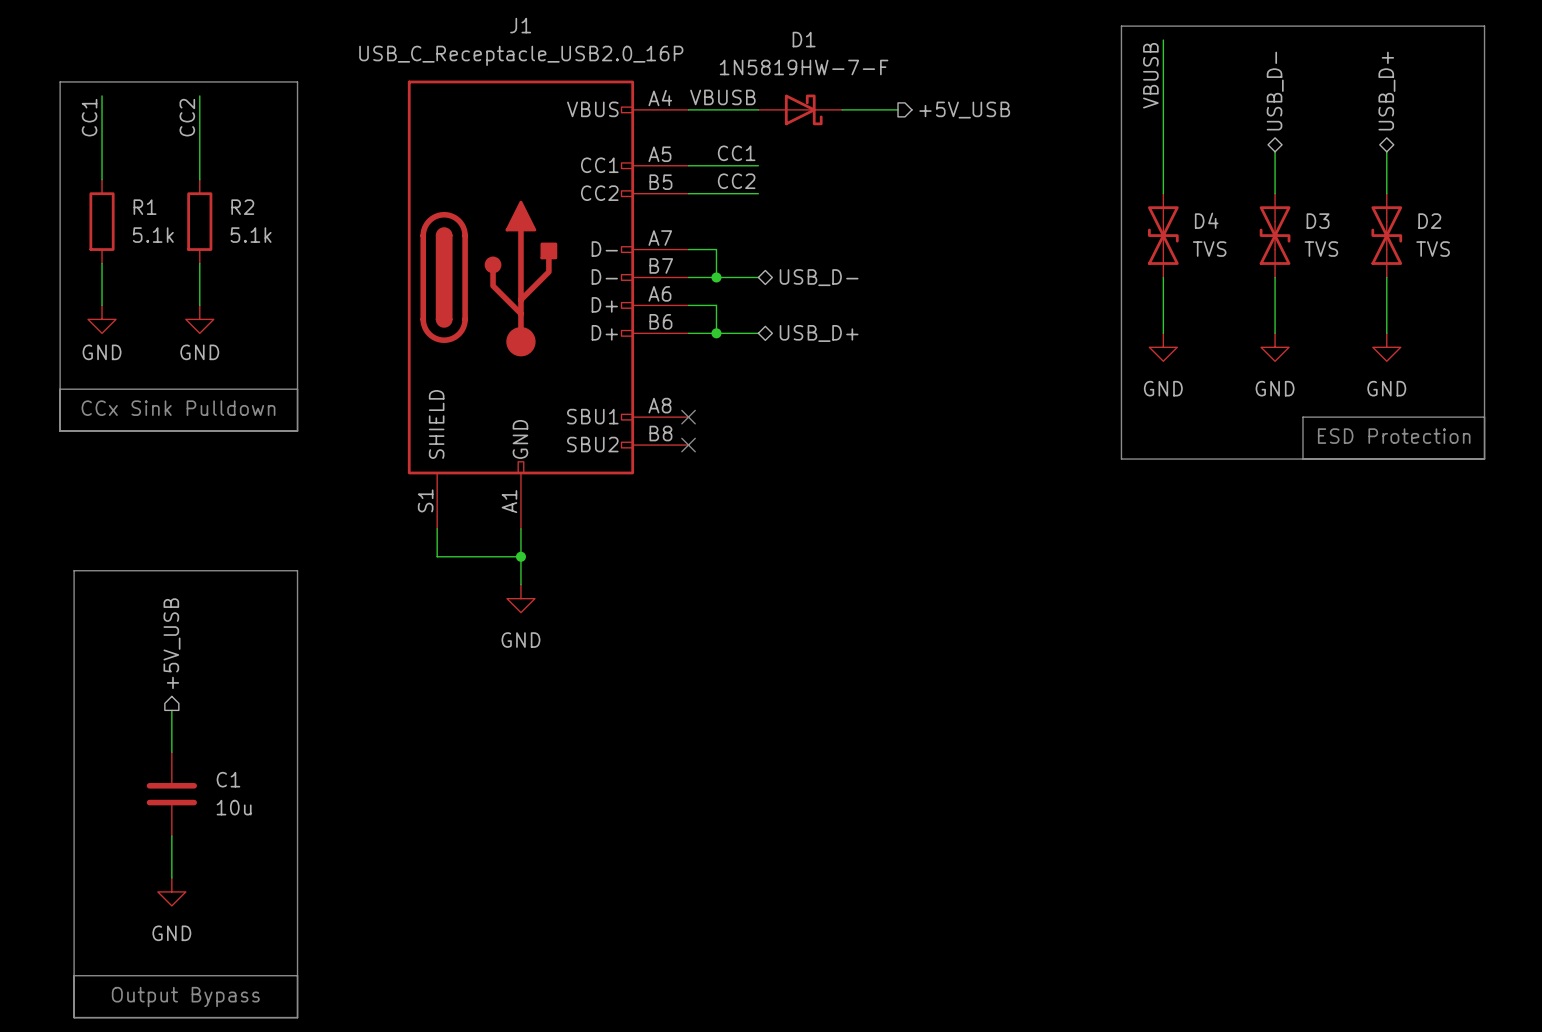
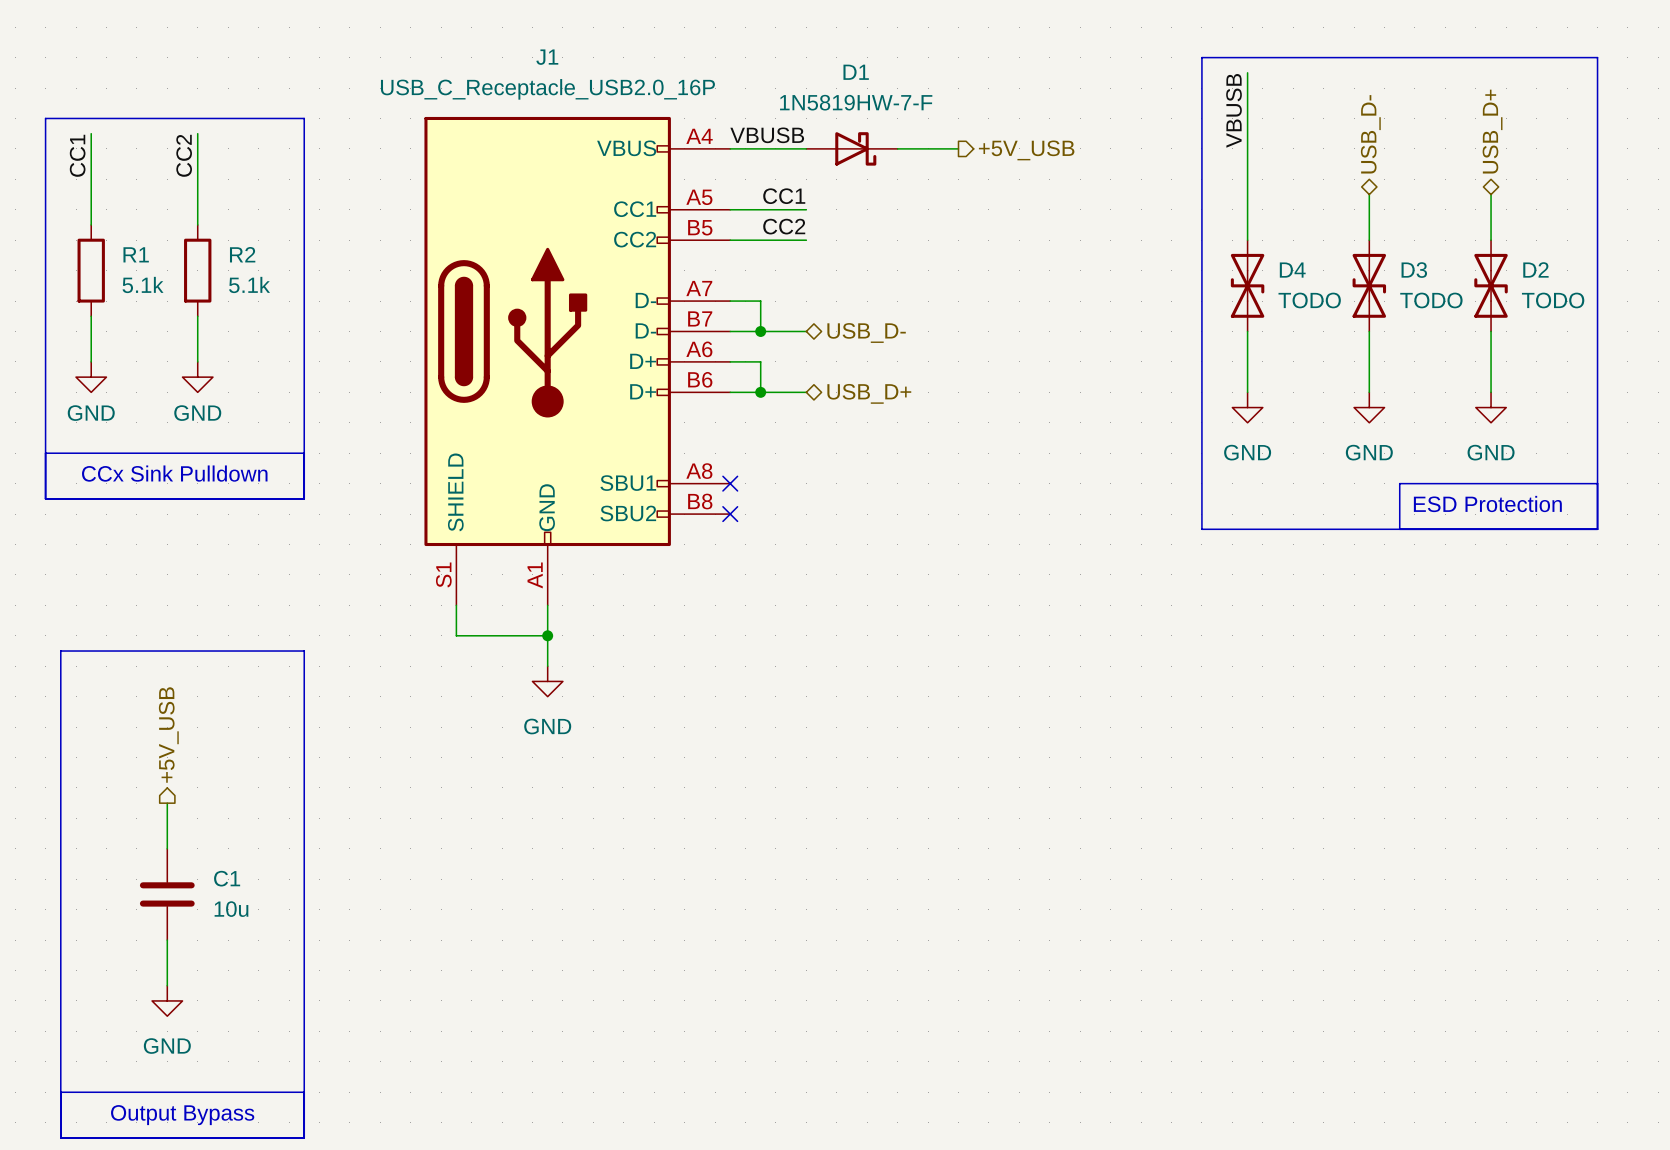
D4 value: TVS (1209, 249) -> TODO (1309, 300)
D3 value: TVS (1321, 249) -> TODO (1431, 300)
D2 value: TVS (1433, 249) -> TODO (1553, 300)

